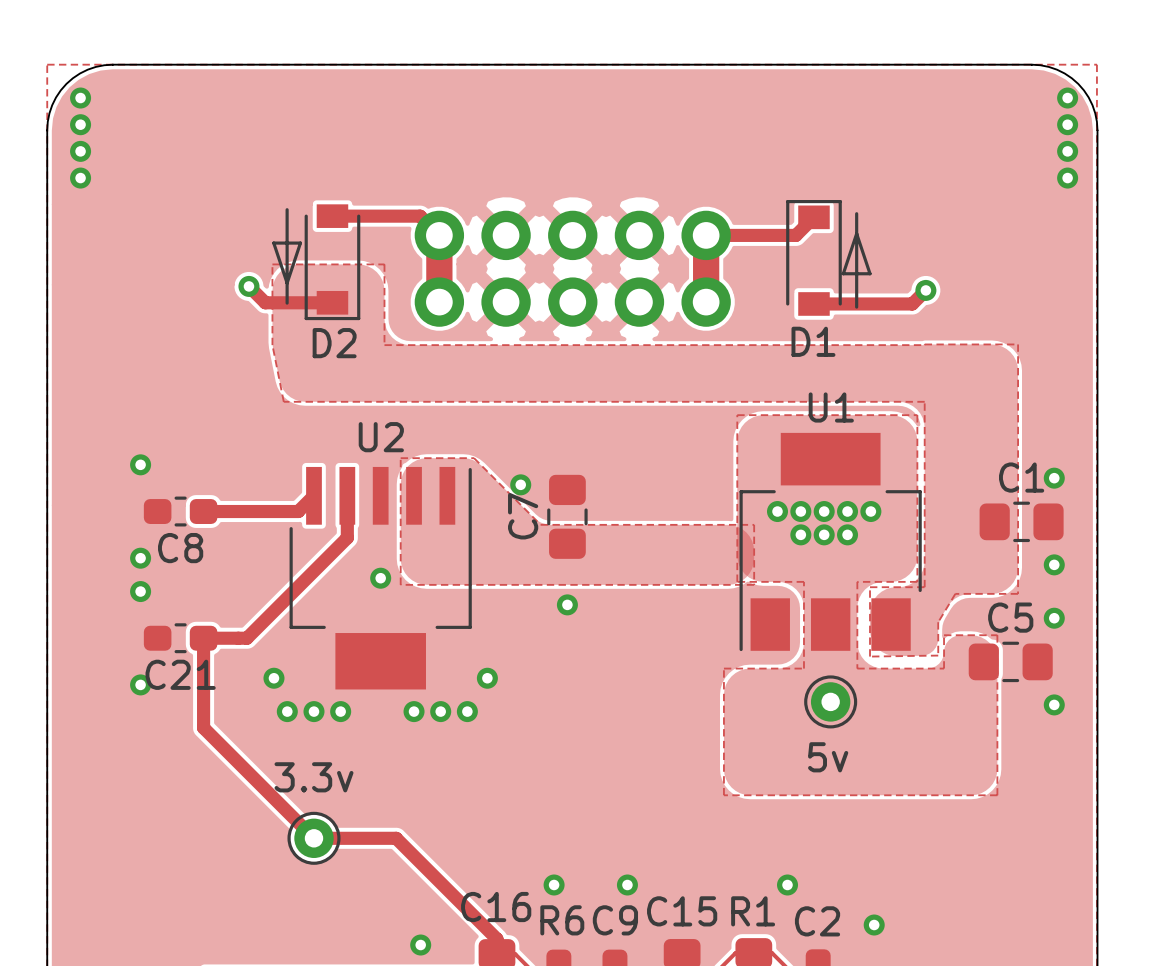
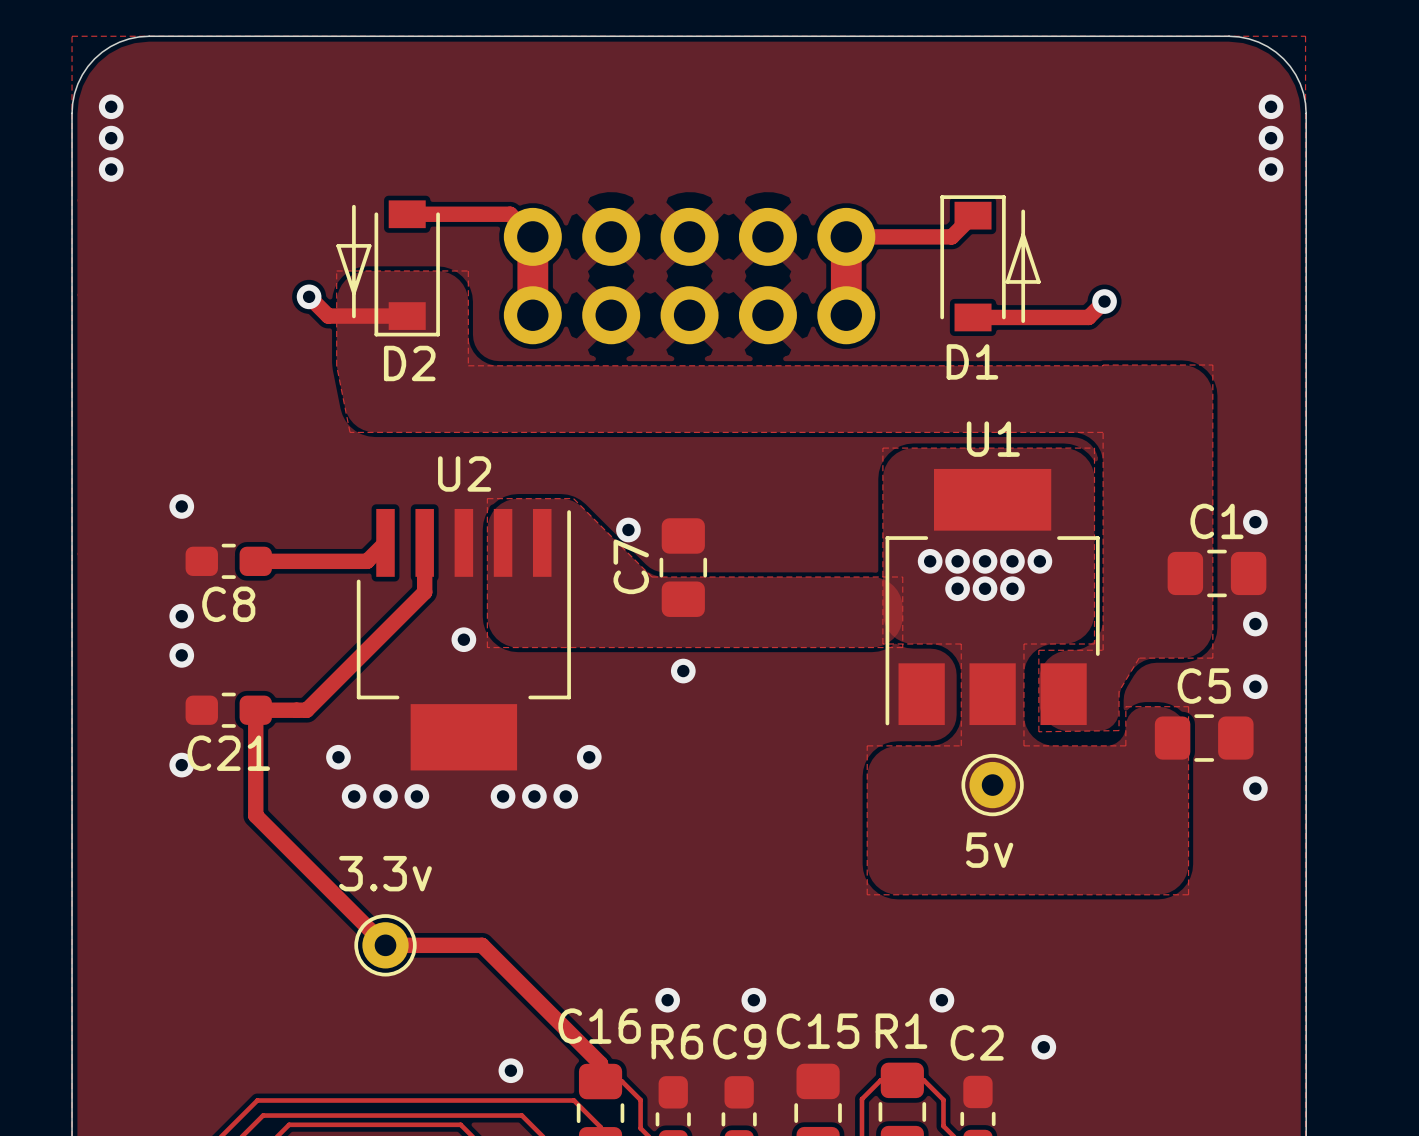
via: (80, 98) -> none
via: (1067, 98) -> none

